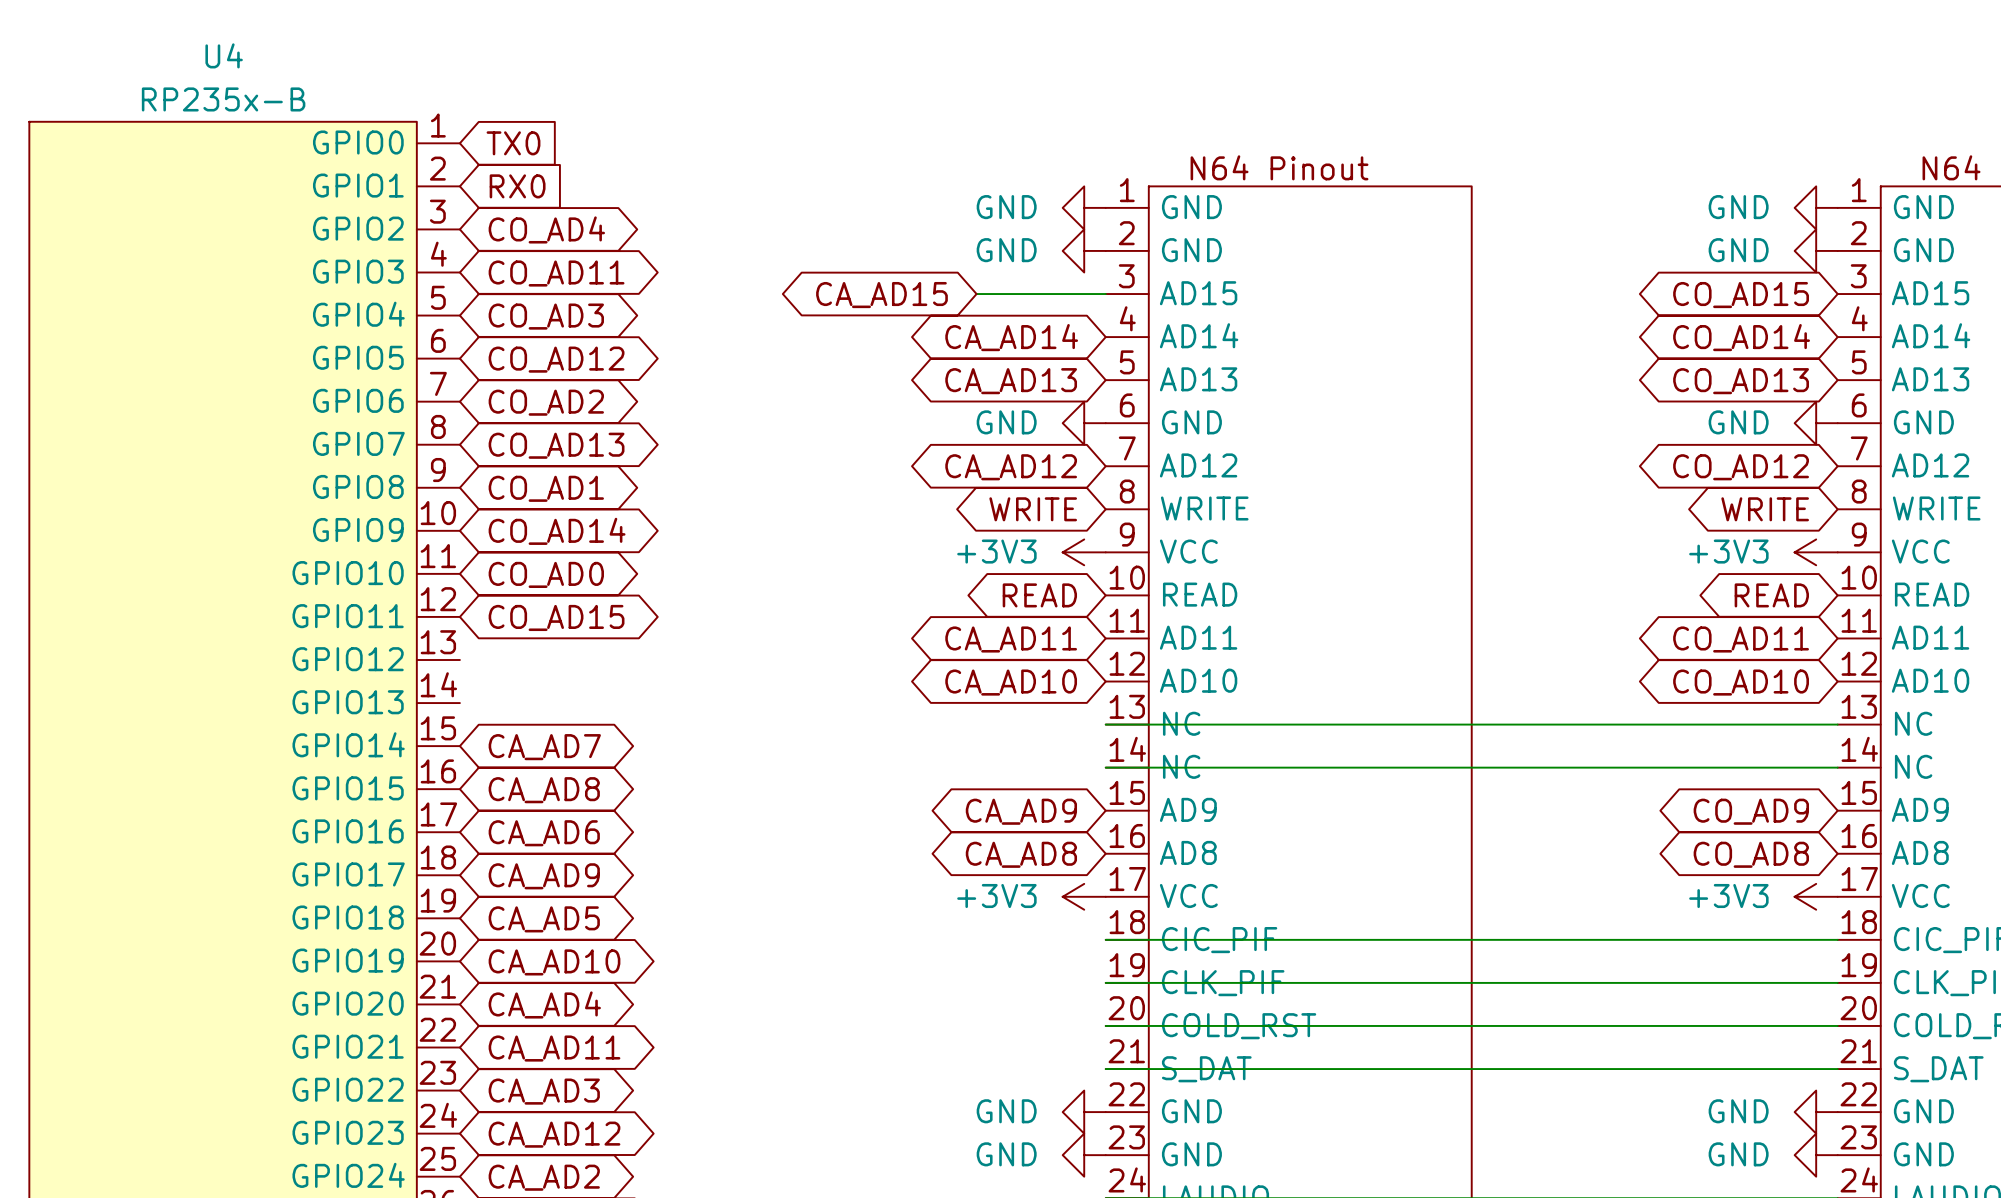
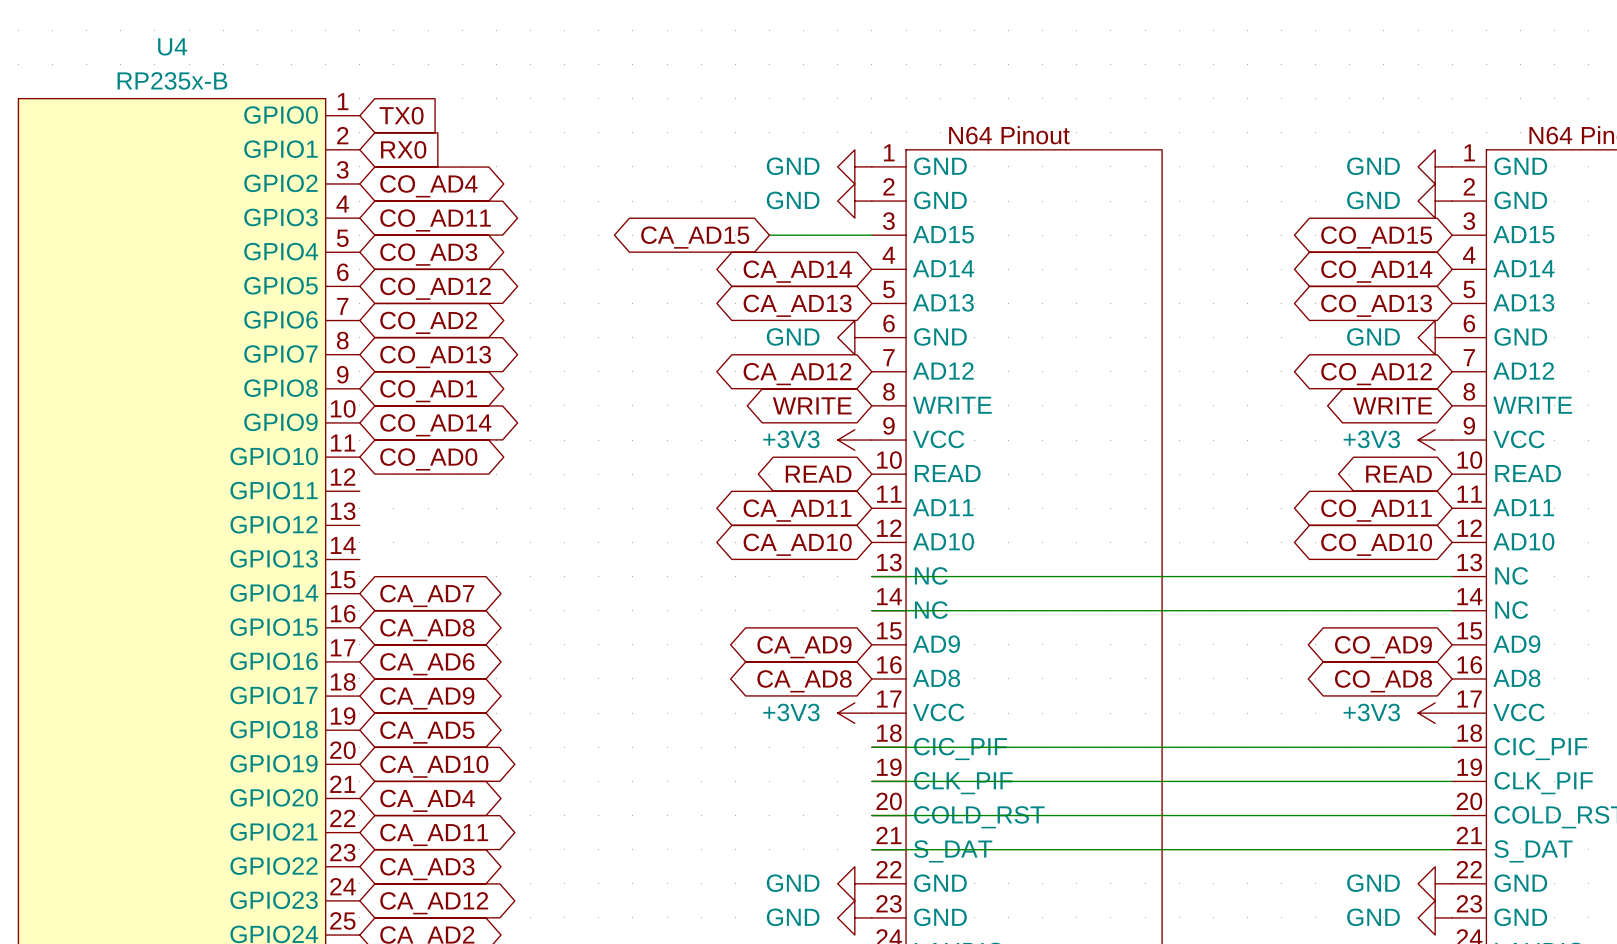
global label: CO_AD15 (556, 617) -> none

